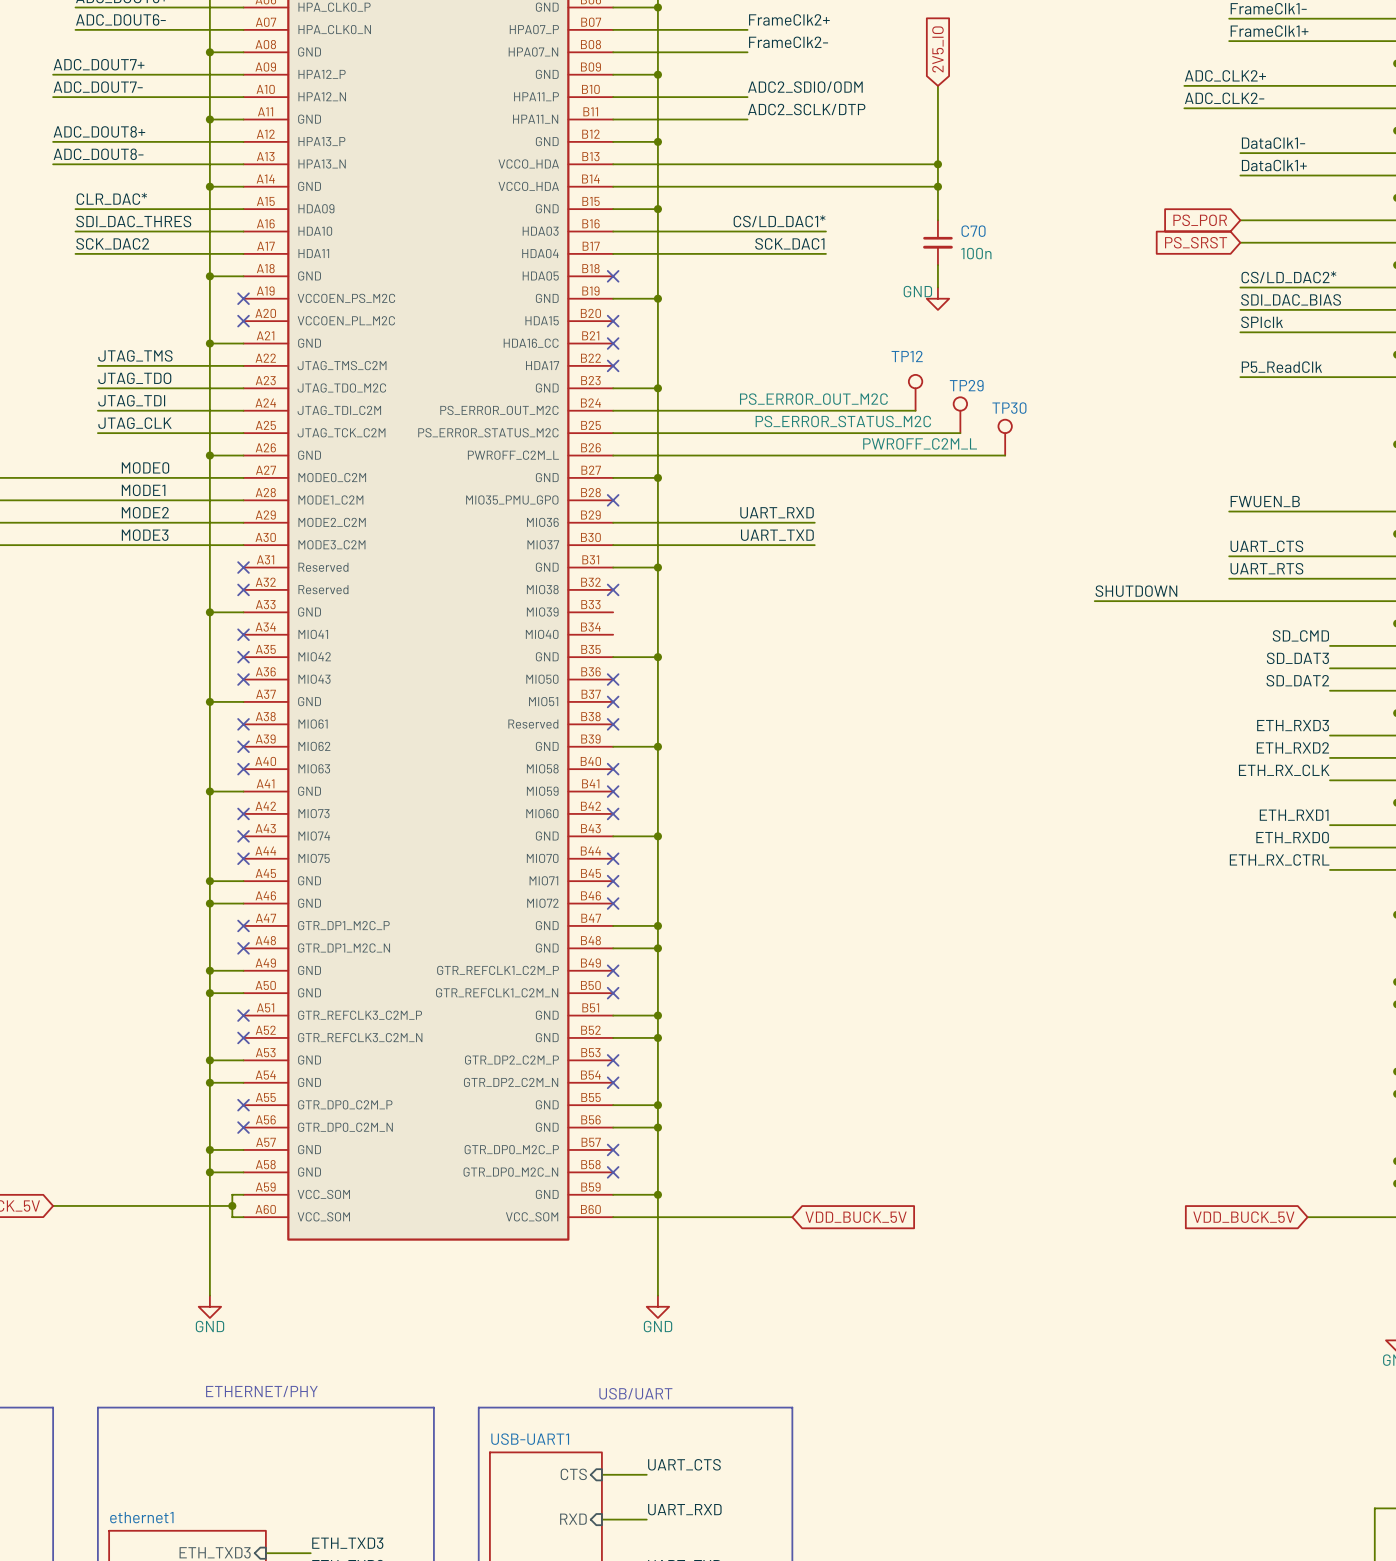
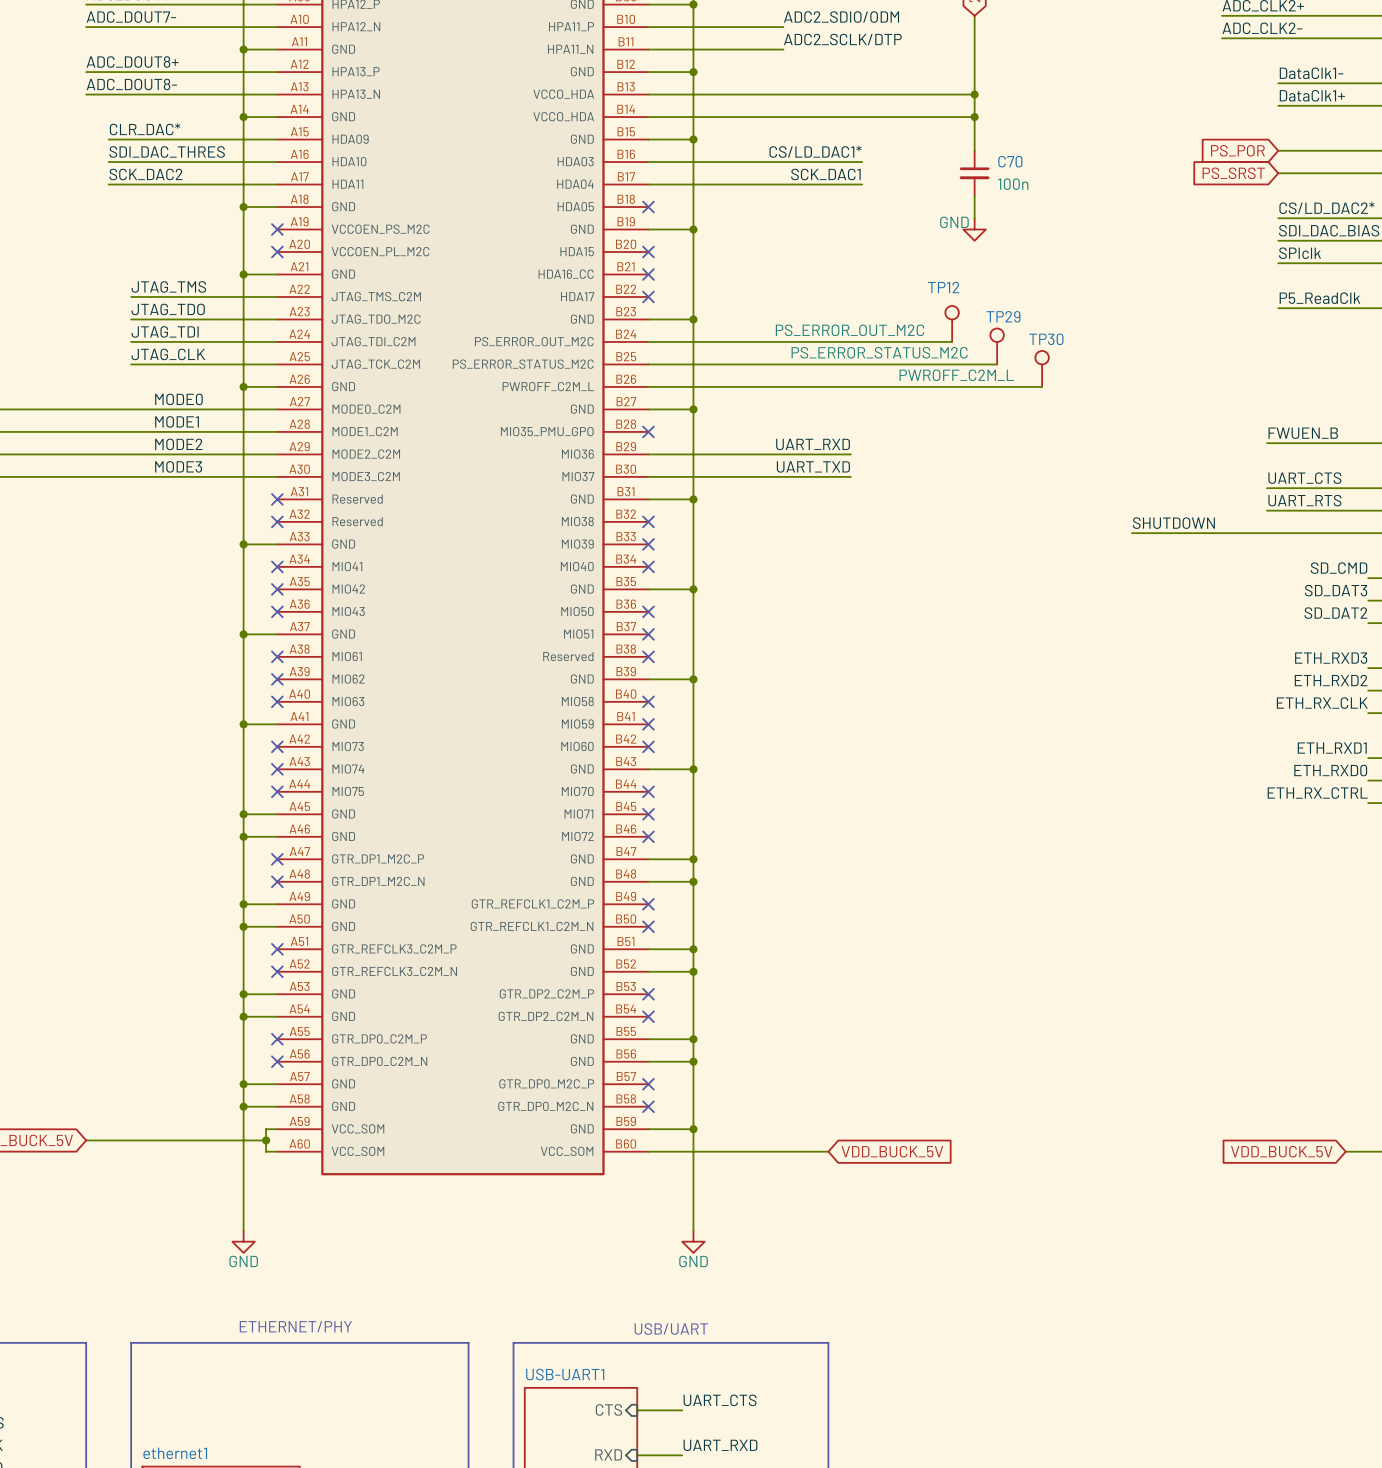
no-connect mark: none -> (648, 544)
no-connect mark: none -> (648, 566)

